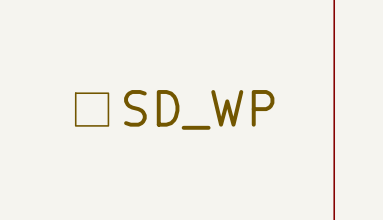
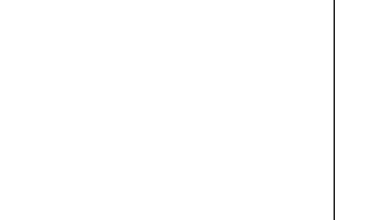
hierarchical label: SD_WP (199, 109) -> none

